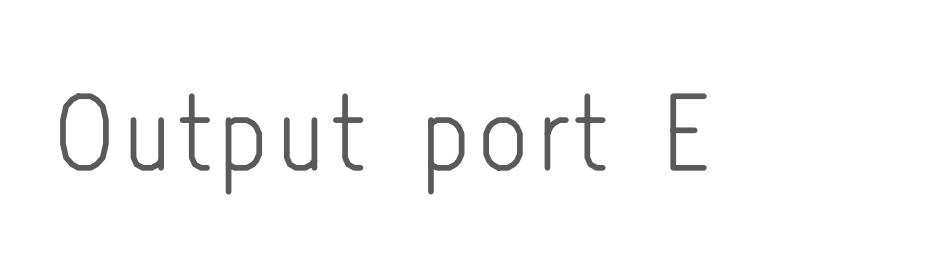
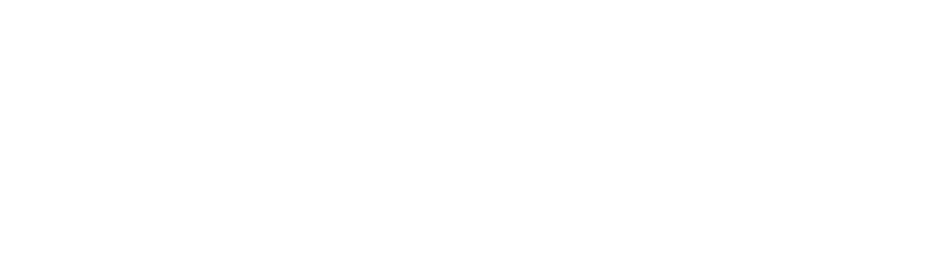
text: Output port E (383, 143) -> none

